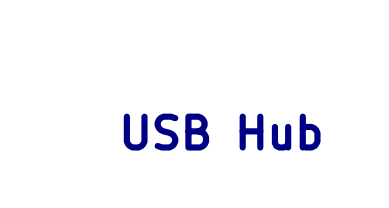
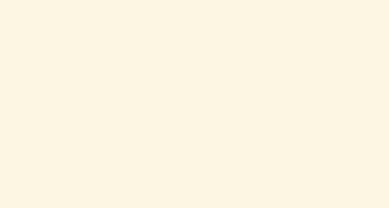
text: USB Hub (222, 132) -> none

